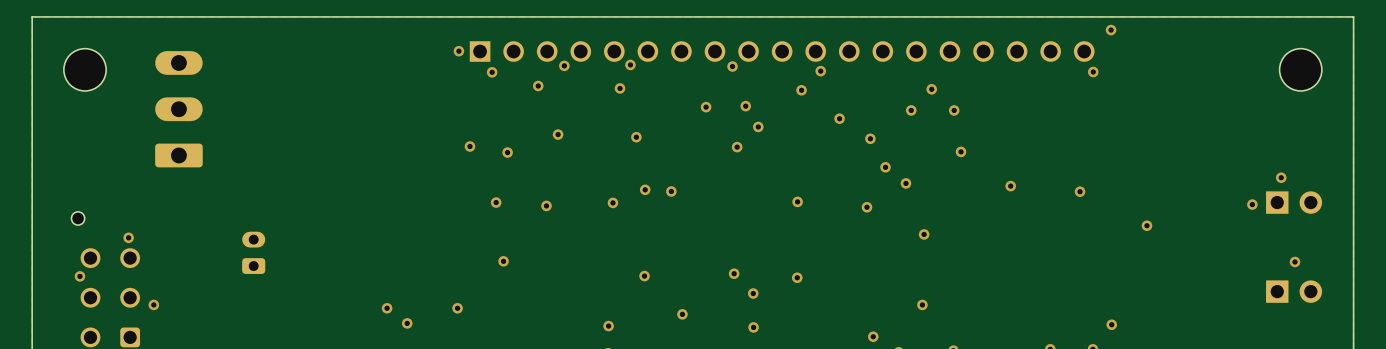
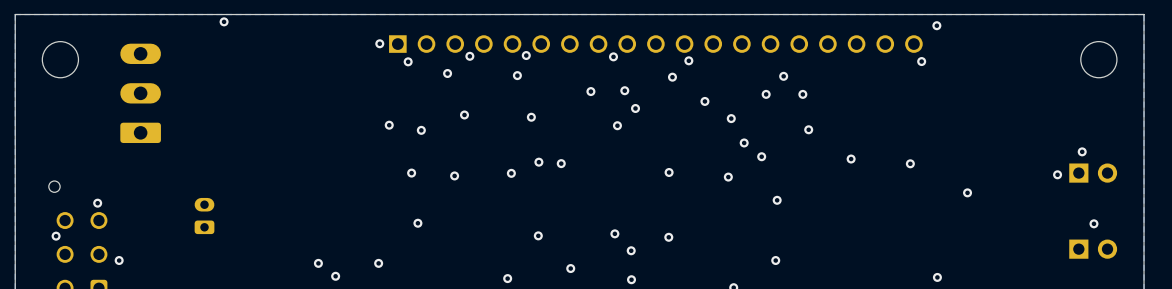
via: none -> (224, 21)

